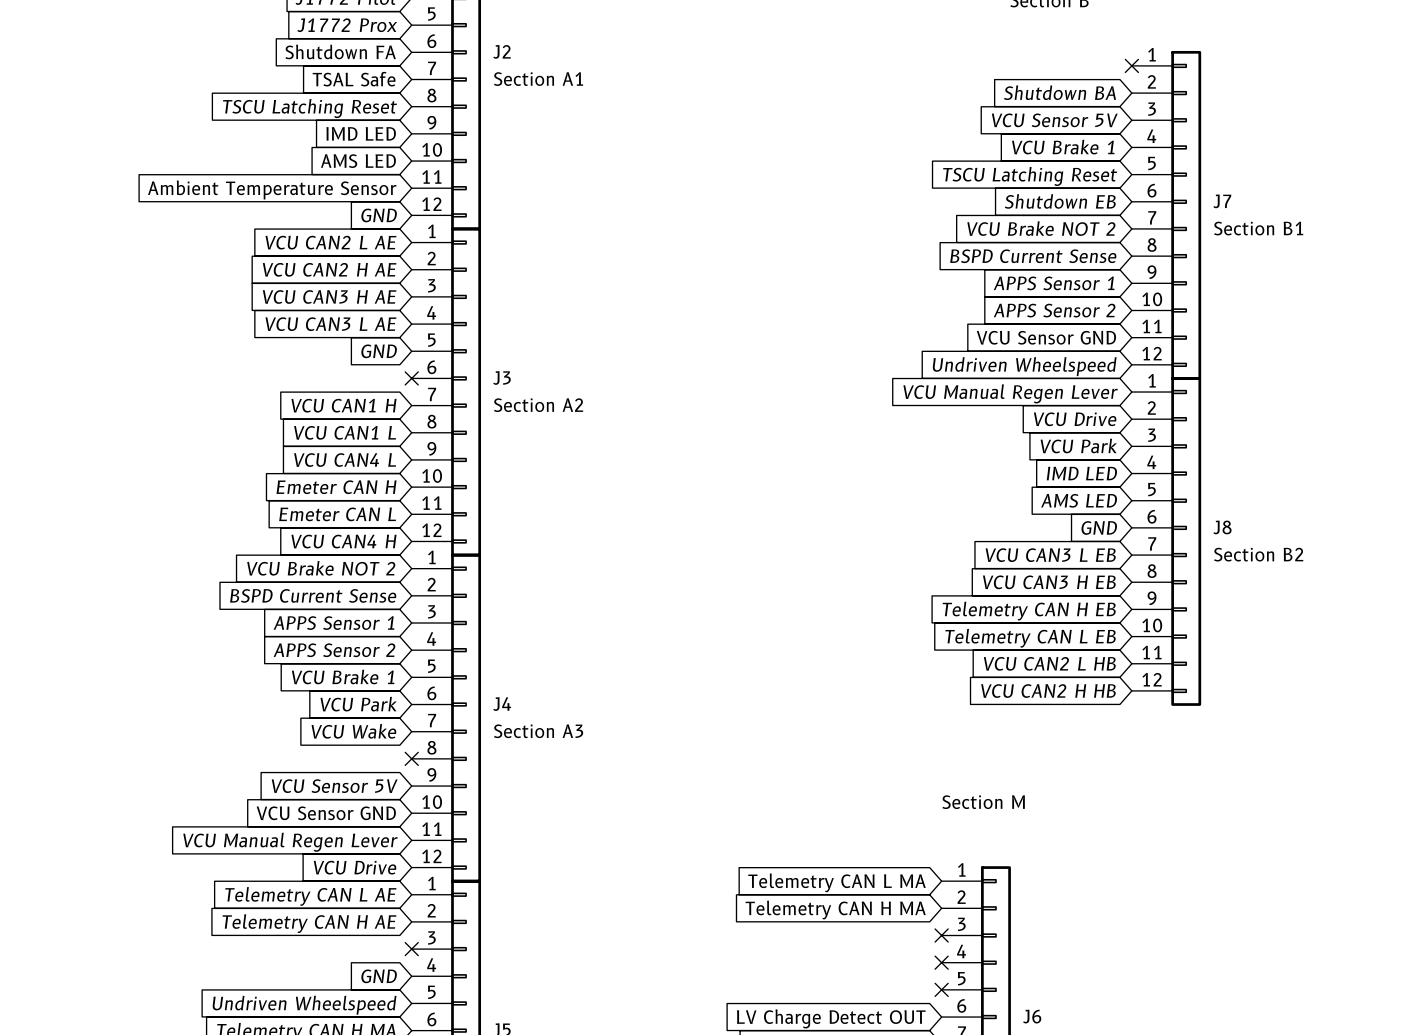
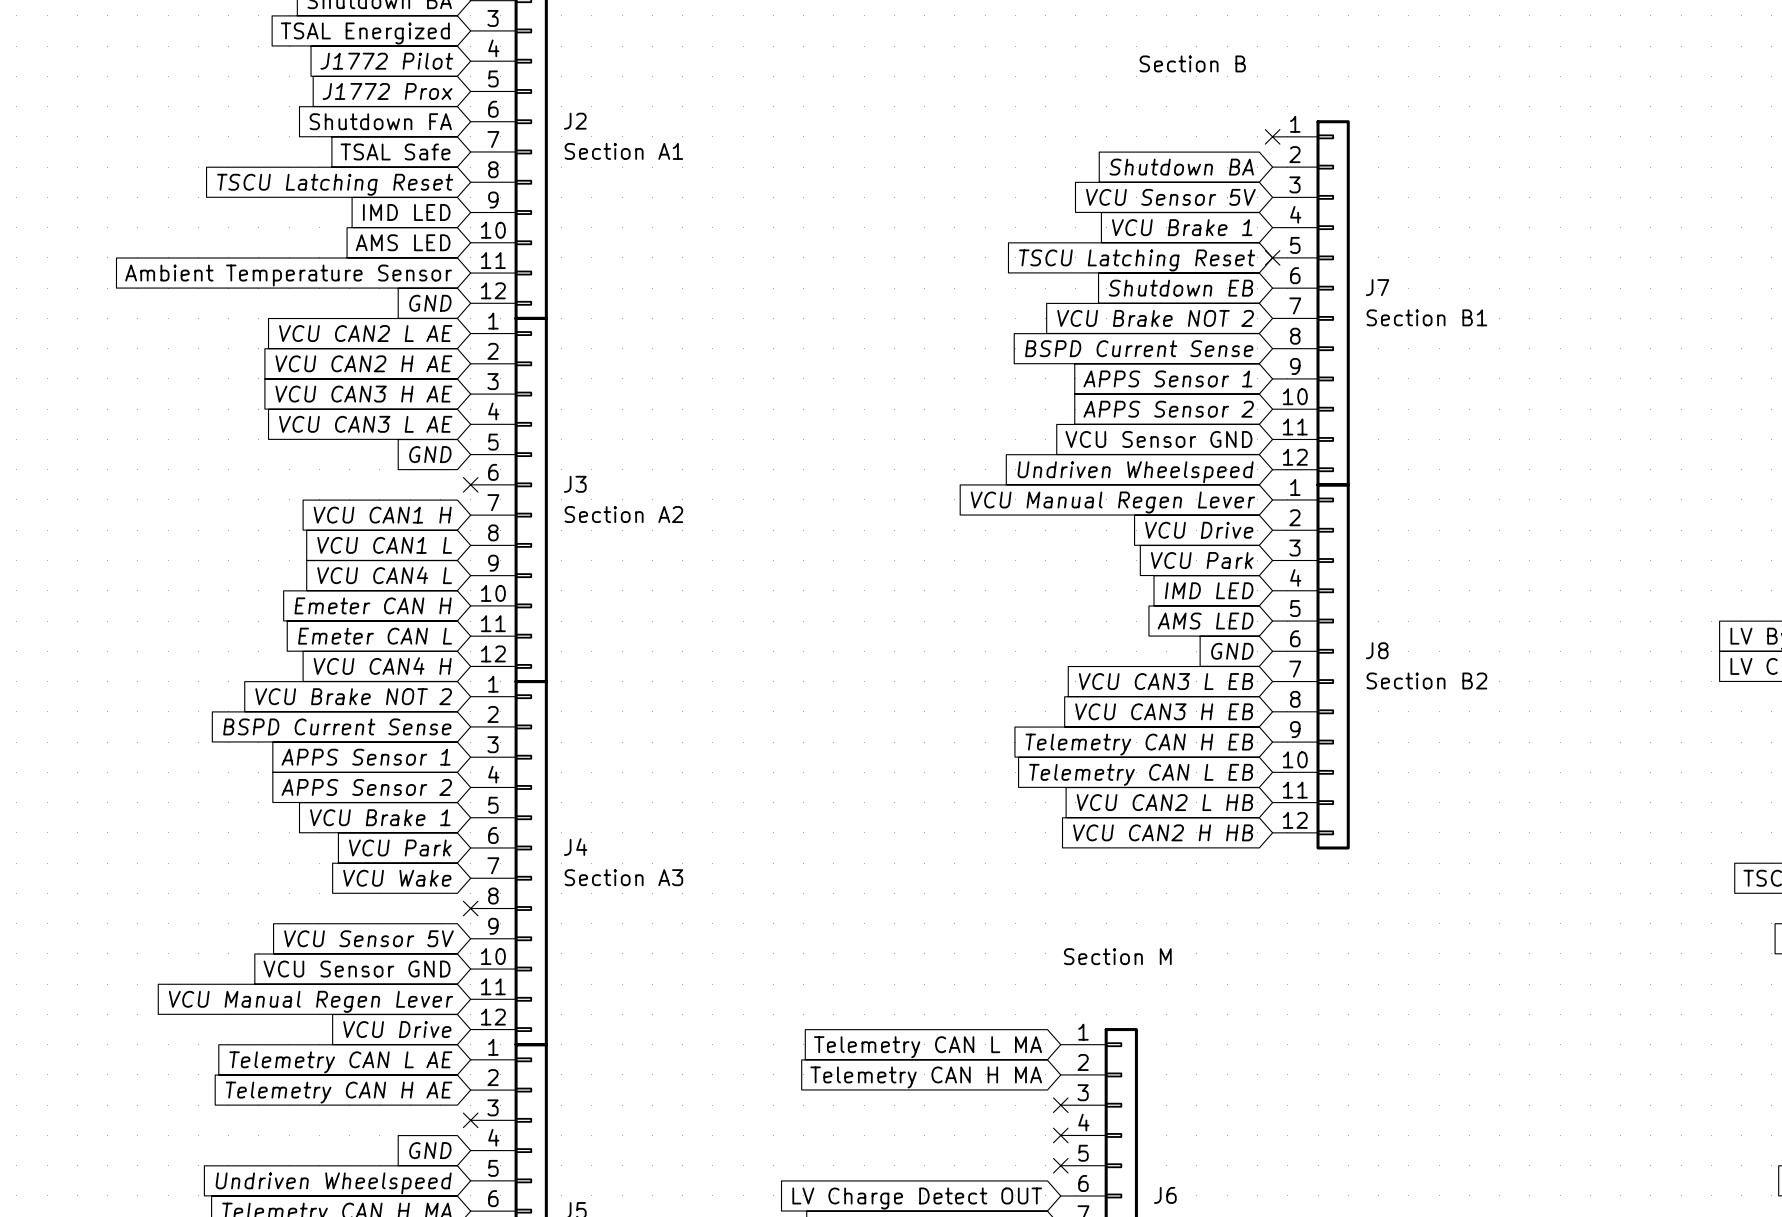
no-connect mark: none -> (1272, 257)

